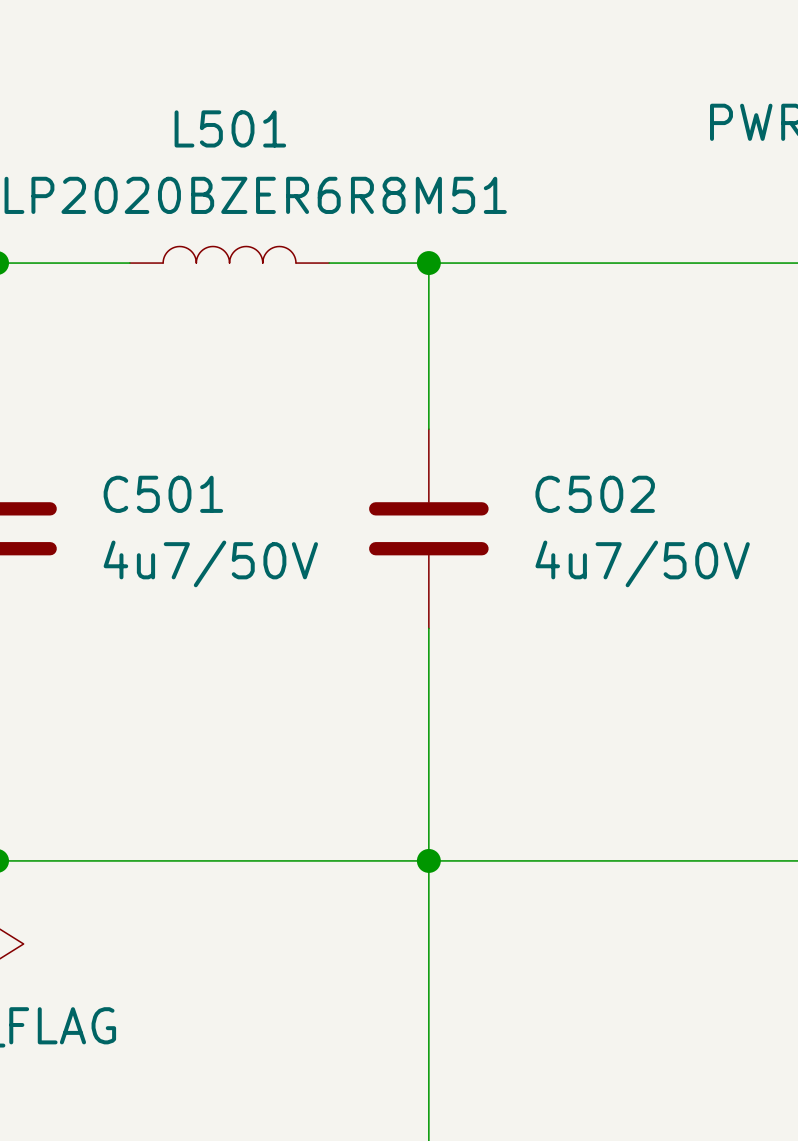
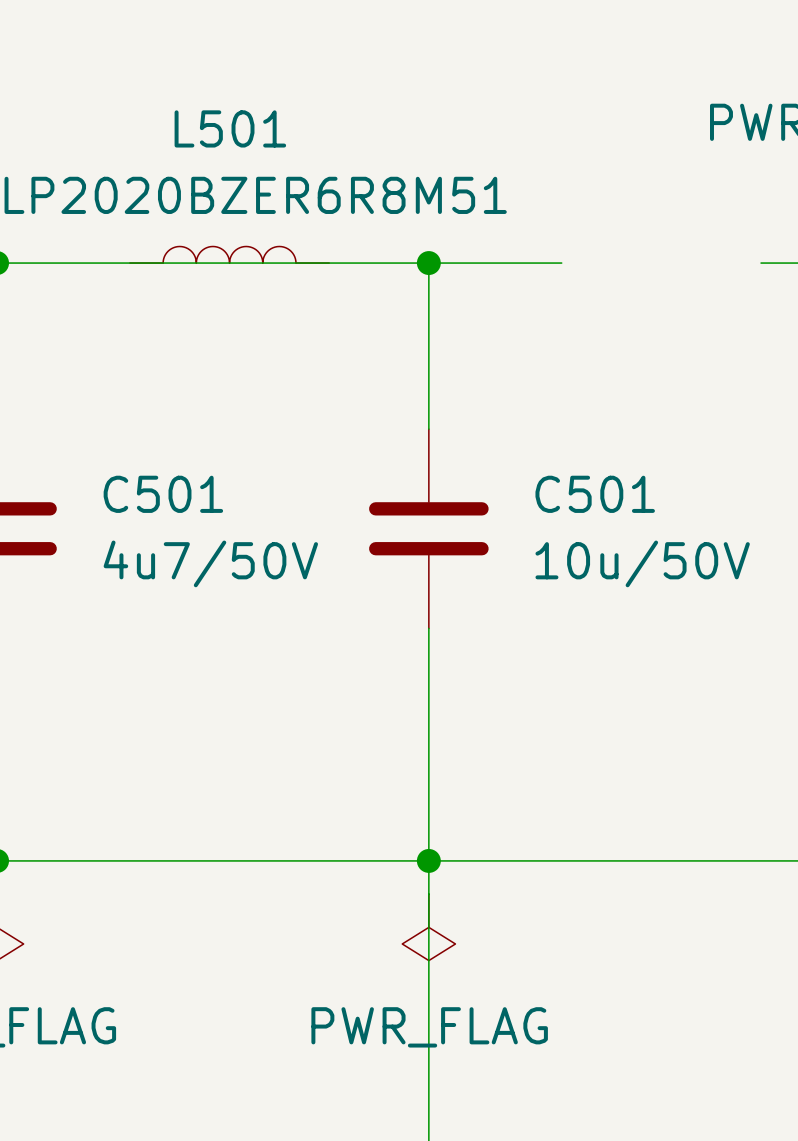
wire: (561, 263) (761, 263) -> (129, 263) (329, 263)
C502 name: C502 (595, 494) -> C501 (595, 494)
C502 value: 4u7/50V (642, 563) -> 10u/50V (642, 563)
power symbol: none -> PWR_FLAG (428, 927)

